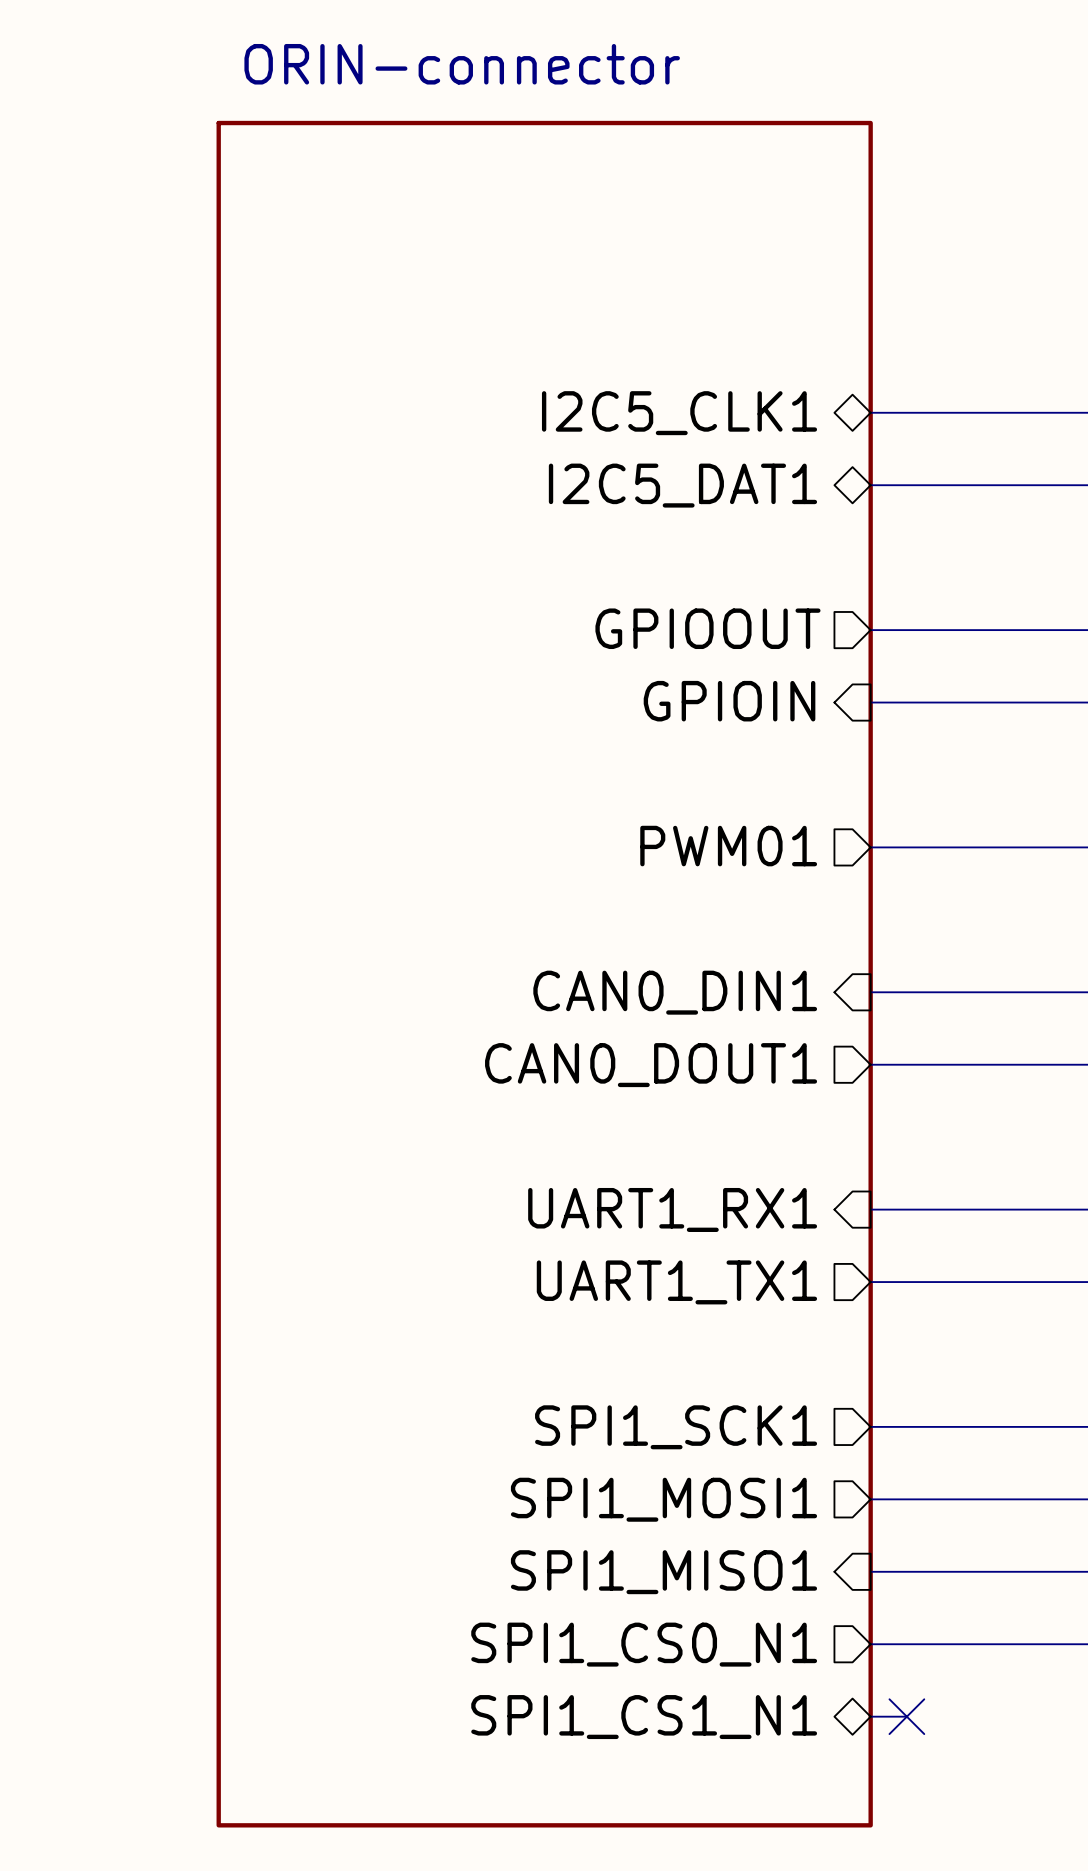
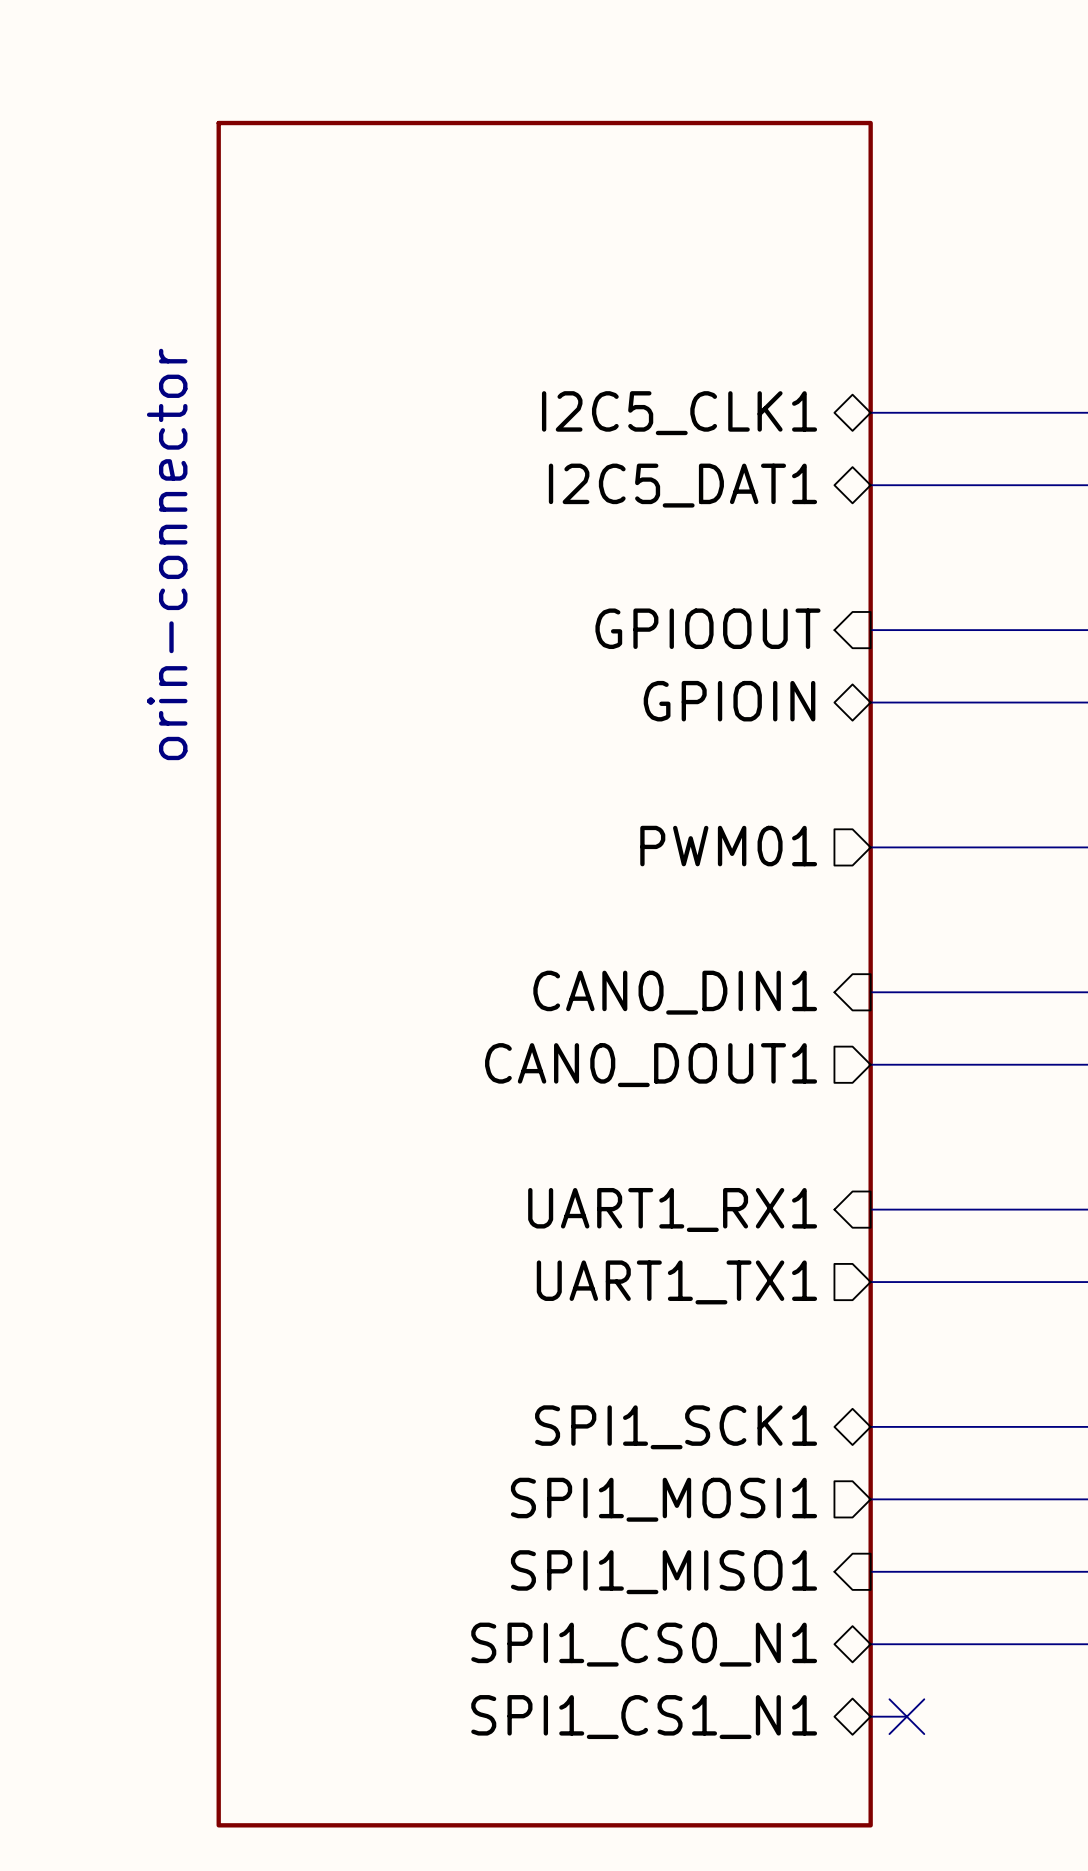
sheet ORIN-connector name: ORIN-connector (462, 64) -> orin-connector (167, 554)
sheet pin shape: output (707, 628) -> input (707, 628)
sheet pin shape: input (729, 701) -> bidirectional (729, 701)
sheet pin shape: output (676, 1427) -> bidirectional (676, 1427)
sheet pin shape: output (644, 1644) -> bidirectional (644, 1644)

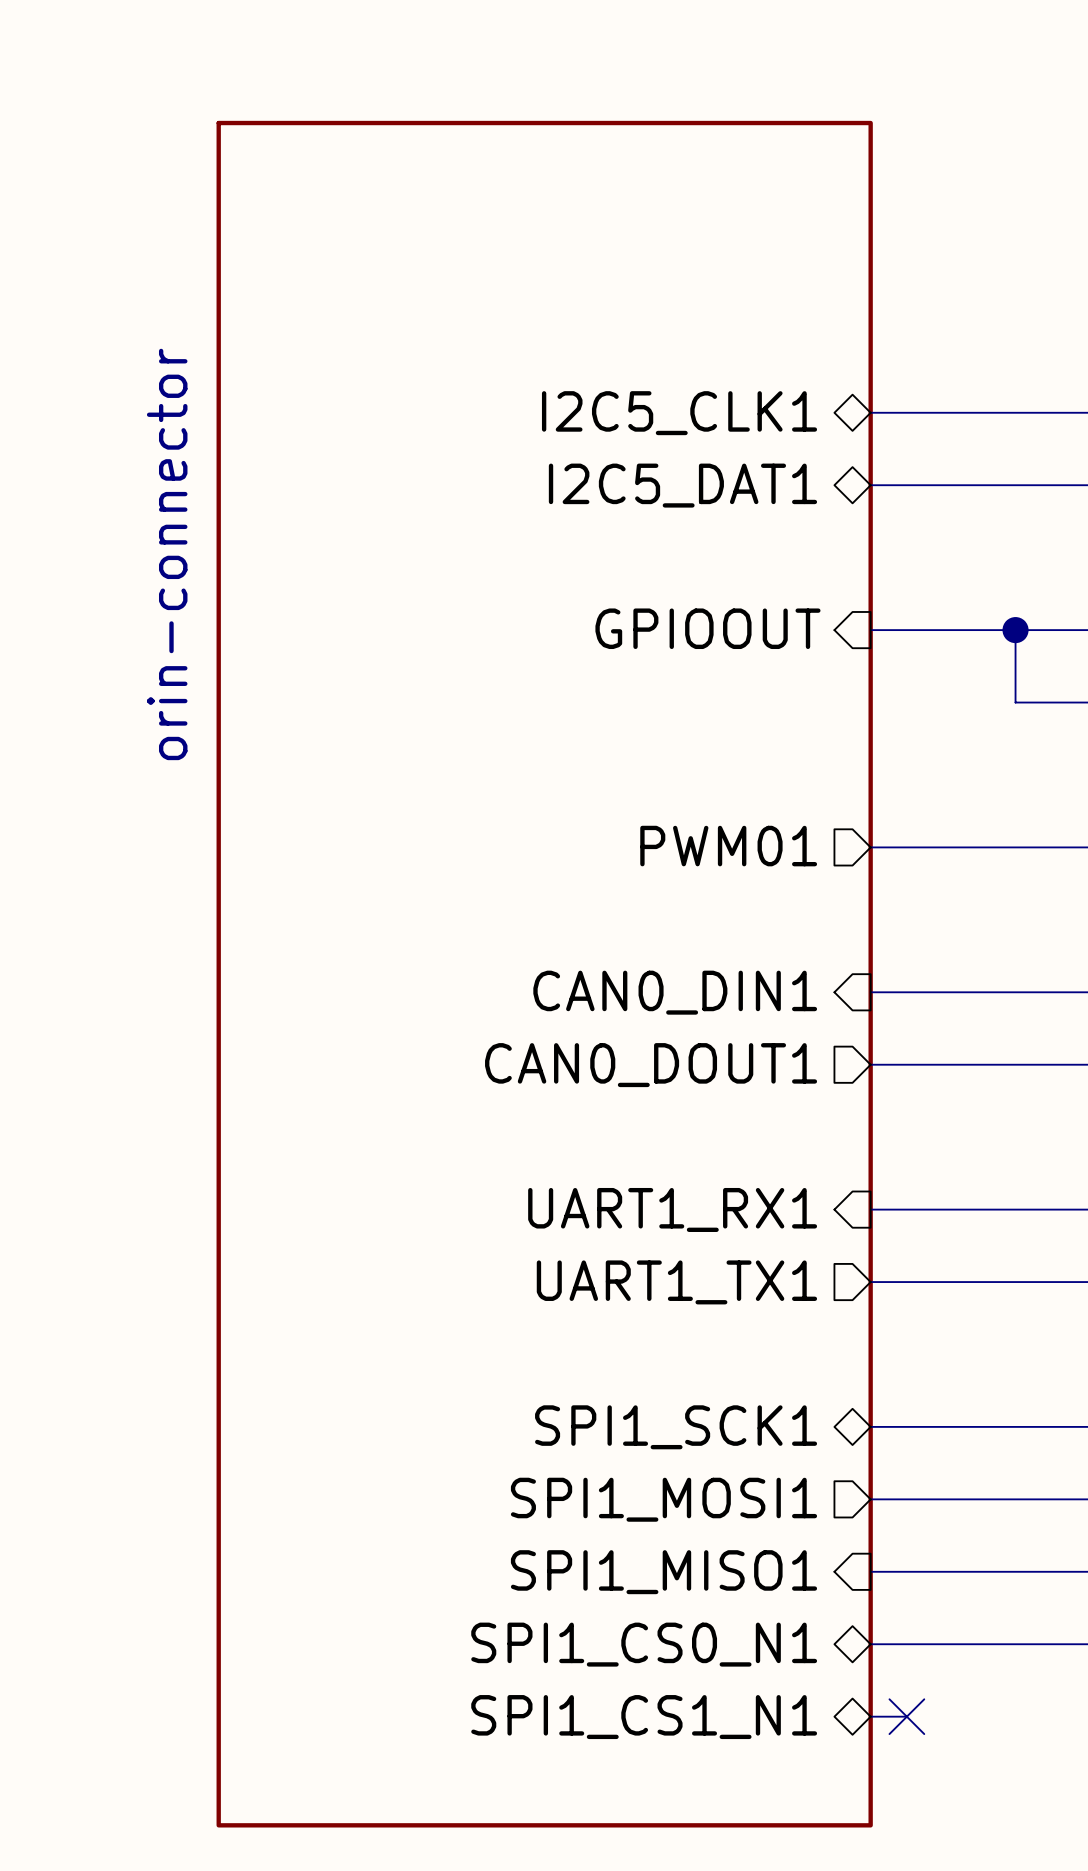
junction: none -> (1015, 630)
sheet pin: GPIOIN (729, 701) -> none
wire: (870, 702) (1015, 702) -> (1015, 630) (1015, 702)

